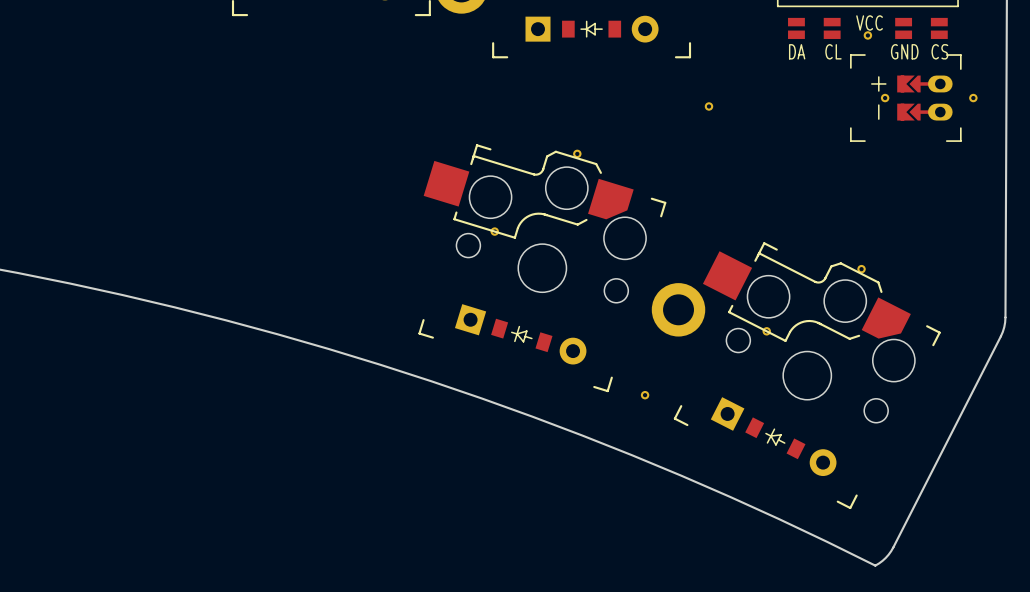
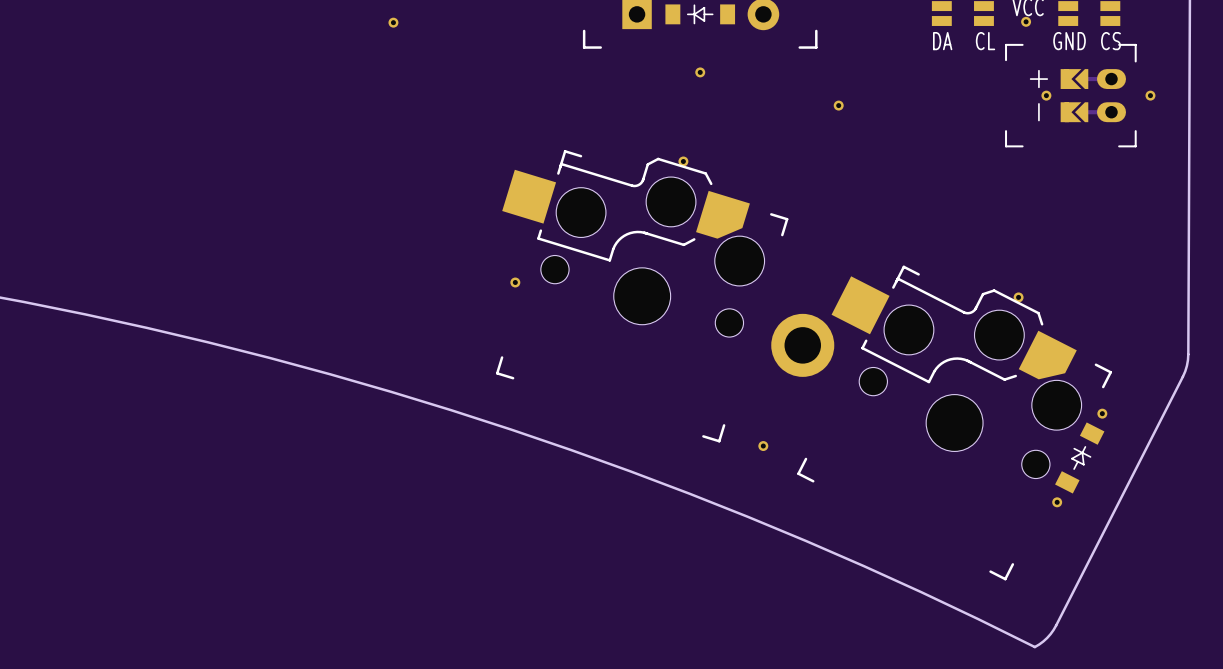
part: none -> (393, 22)
part: none -> (700, 72)
part position: (494, 231) -> (515, 282)
part: (766, 331) -> none
part: (520, 334) -> none
part: none -> (1102, 413)
part: none -> (1079, 457)
part: (773, 436) -> none
part: none -> (1057, 502)

